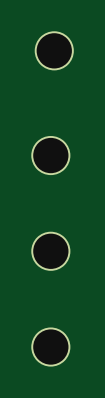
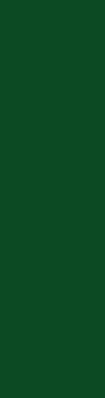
part: (54, 50) -> none
part: (50, 155) -> none
part: (50, 251) -> none
part: (50, 347) -> none

